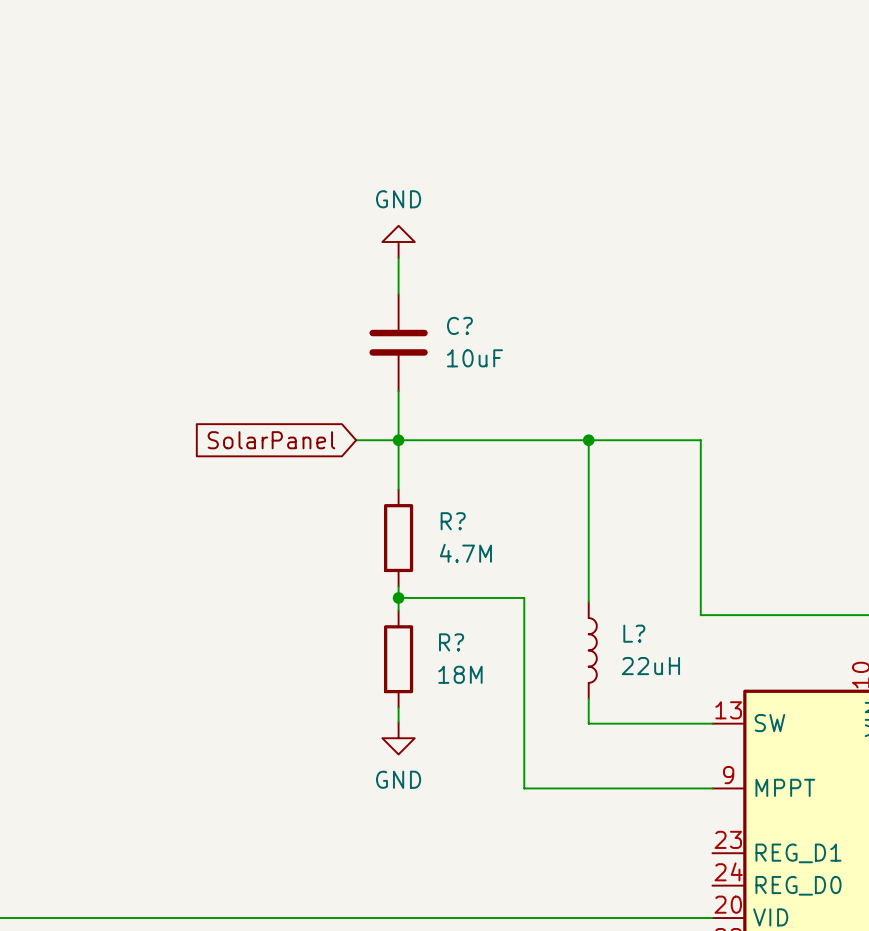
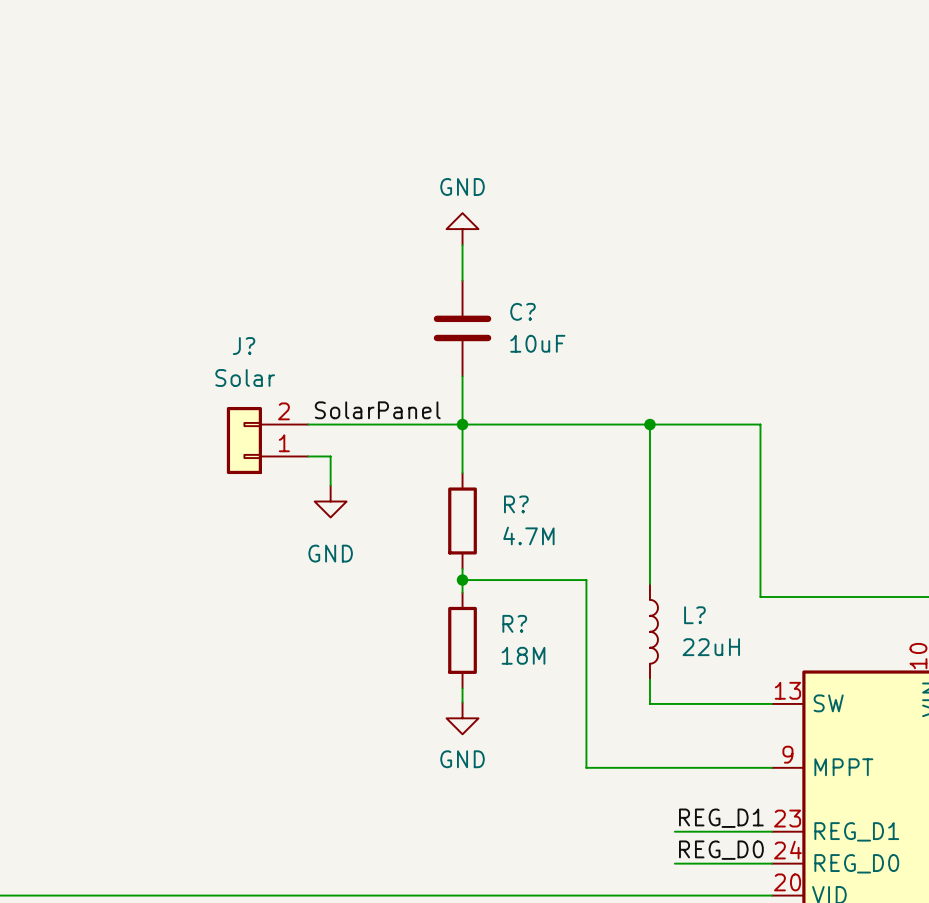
label: none -> SolarPanel (377, 410)
wire: none -> (308, 424) (420, 424)
global label: SolarPanel (271, 440) -> none
J?: none -> Solar (267, 440)
wire: none -> (308, 456) (330, 456) (330, 485)
power symbol: none -> GND (330, 501)
label: none -> REG_D1 (721, 818)
wire: none -> (674, 831) (771, 831)
label: none -> REG_D0 (721, 850)
wire: none -> (674, 863) (771, 863)

